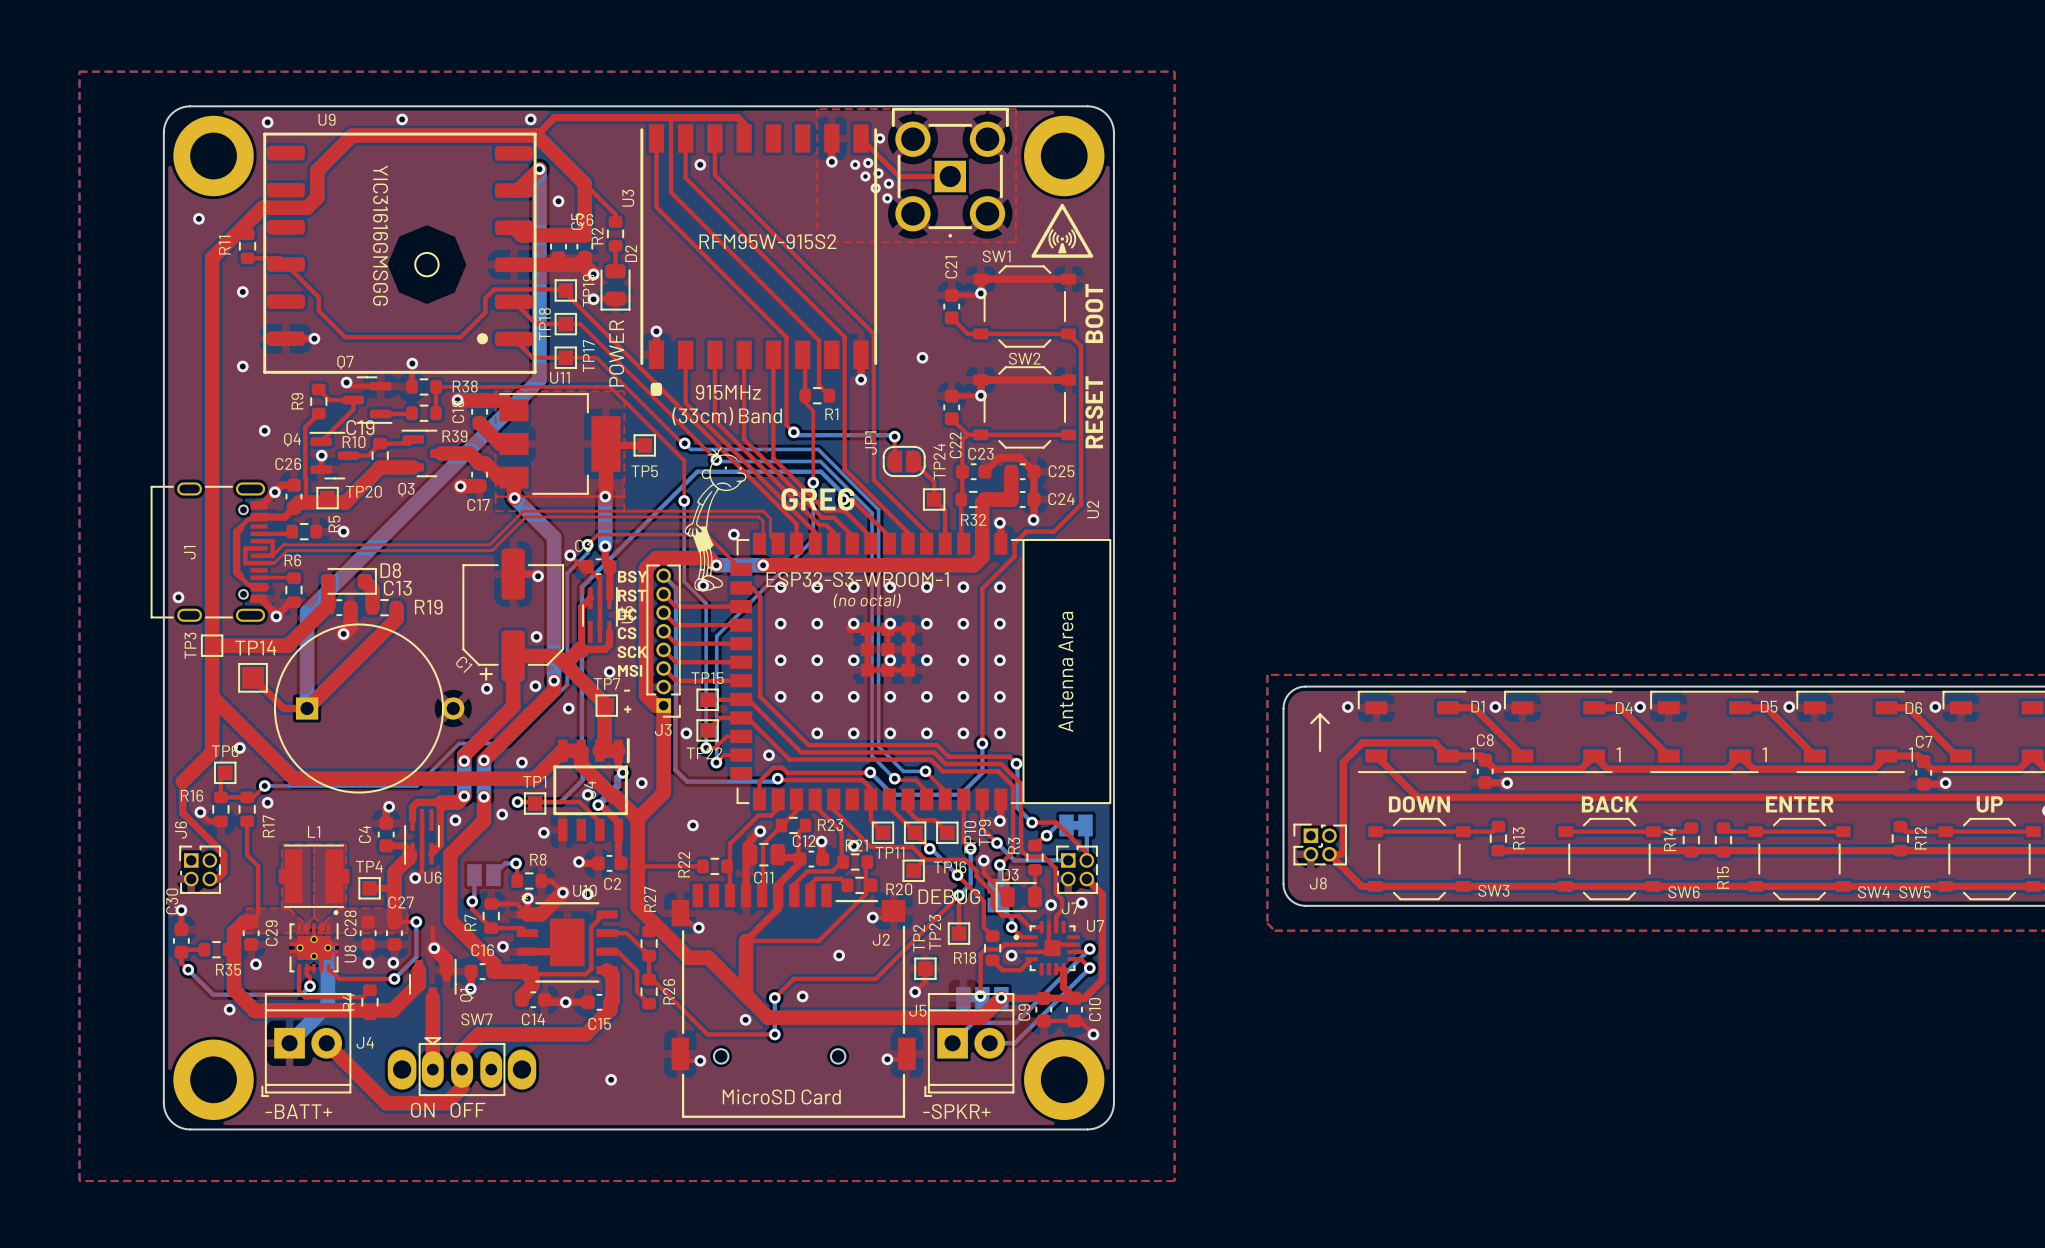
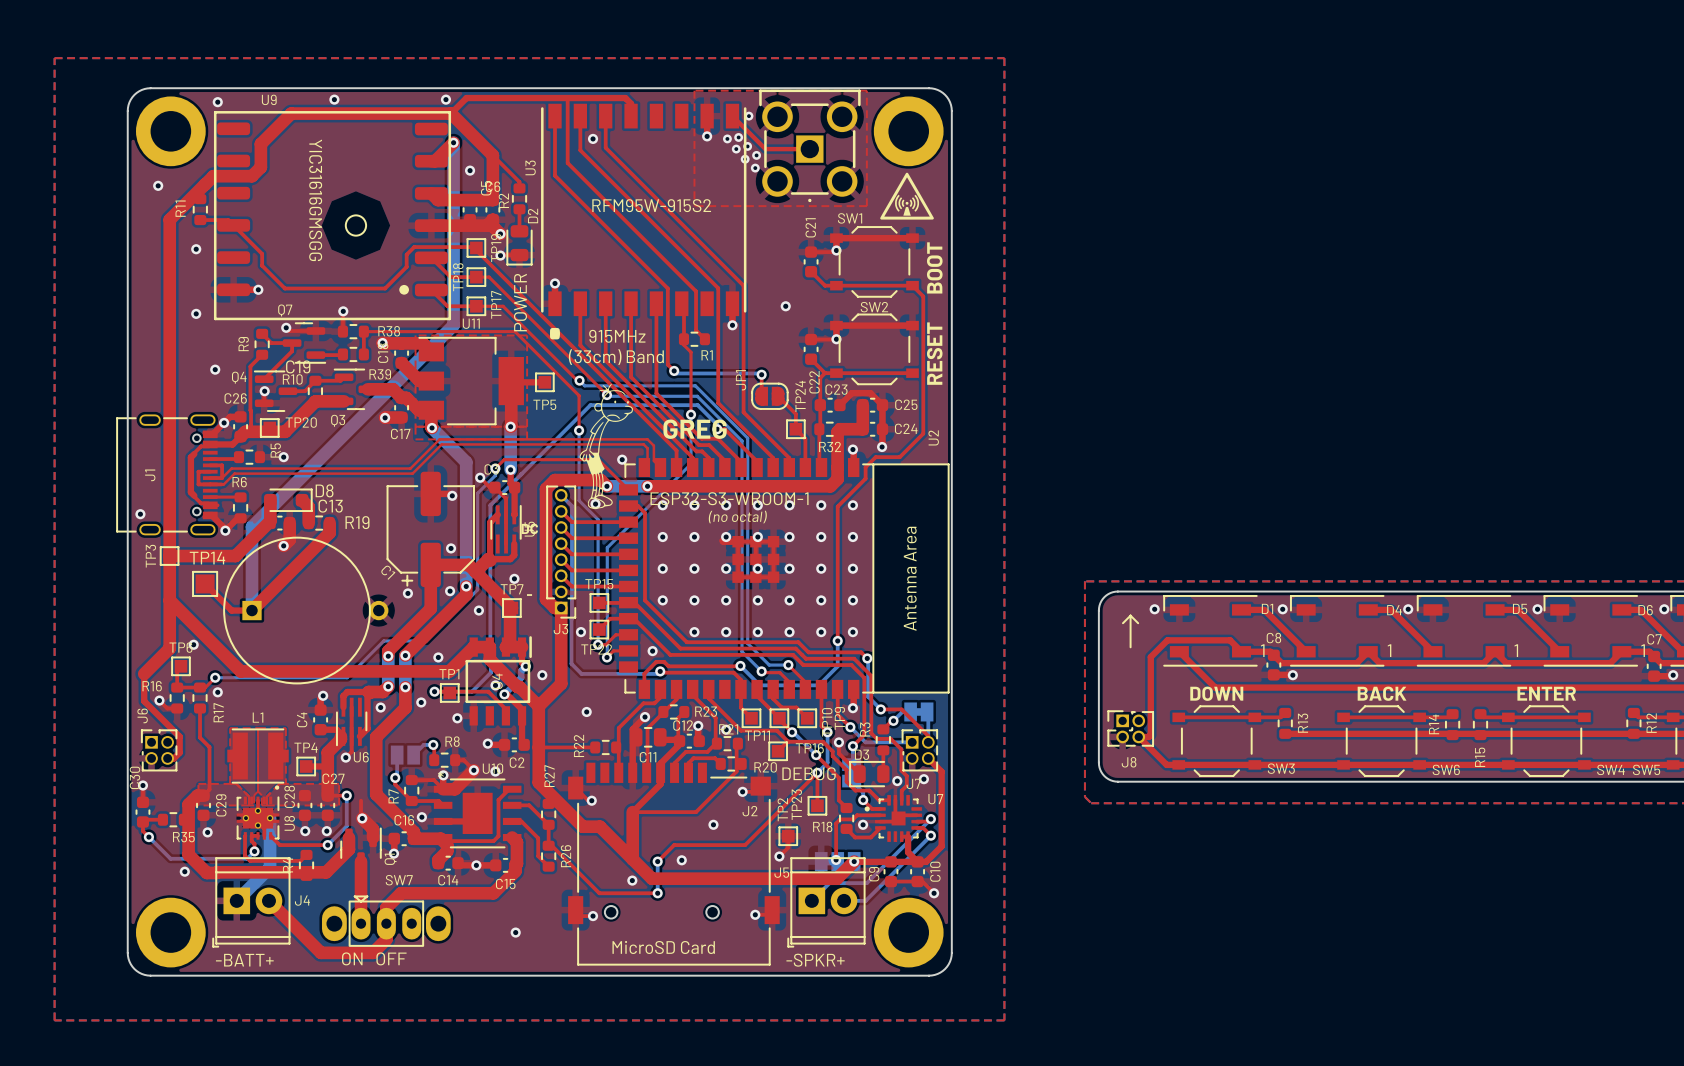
text: BSY (632, 576) -> none
text: RST (632, 595) -> none
text: CS (627, 633) -> none
text: SCK (632, 652) -> none
text: MSI (630, 670) -> none
text: + (627, 709) -> none

